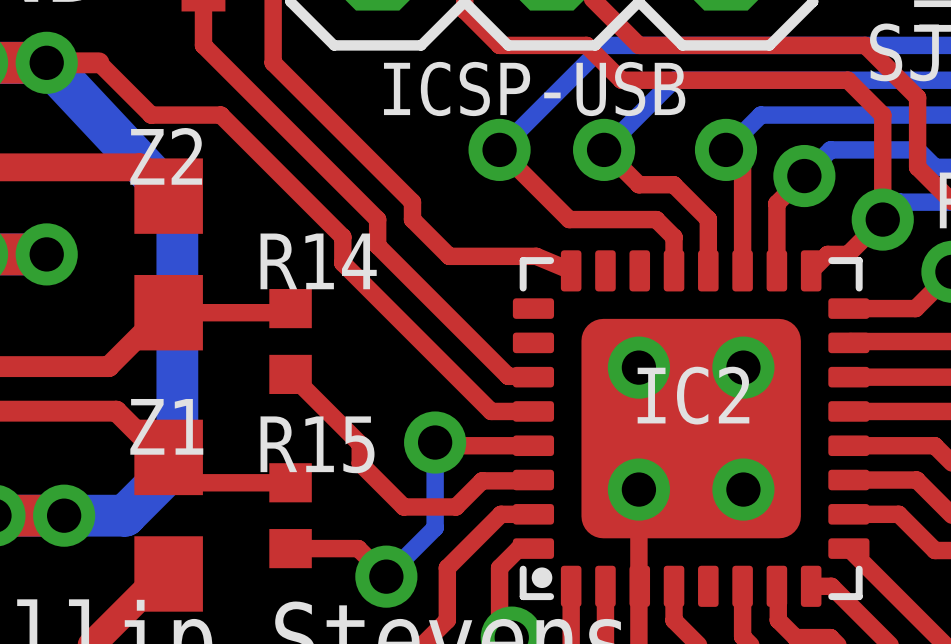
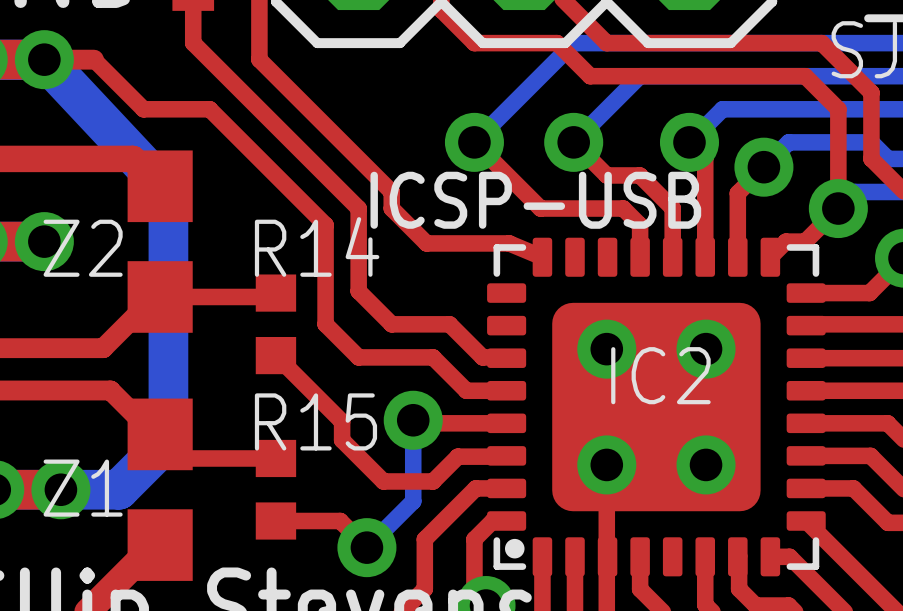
text position: ICSP-USB (534, 88) -> ICSP-USB (535, 200)
Z2 name position: Z2 (166, 156) -> Z2 (83, 248)
top track: (377, 245) (473, 341) -> (358, 233) (358, 291) (391, 324) (449, 324)
top track: (342, 263) (456, 376) -> (325, 249) (325, 324) (358, 357) (433, 357)
Z1 name position: Z1 (166, 426) -> Z1 (83, 488)

